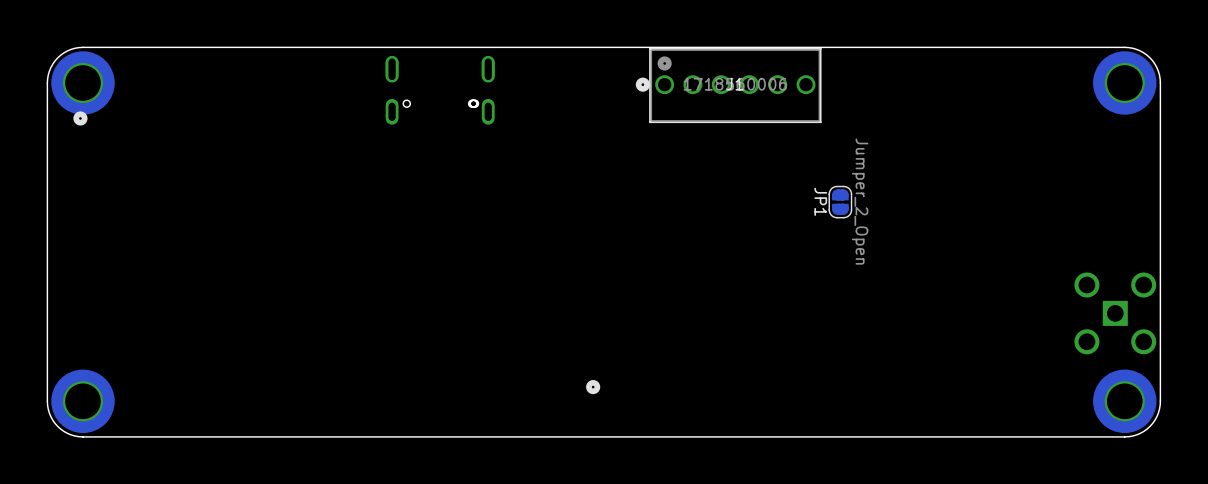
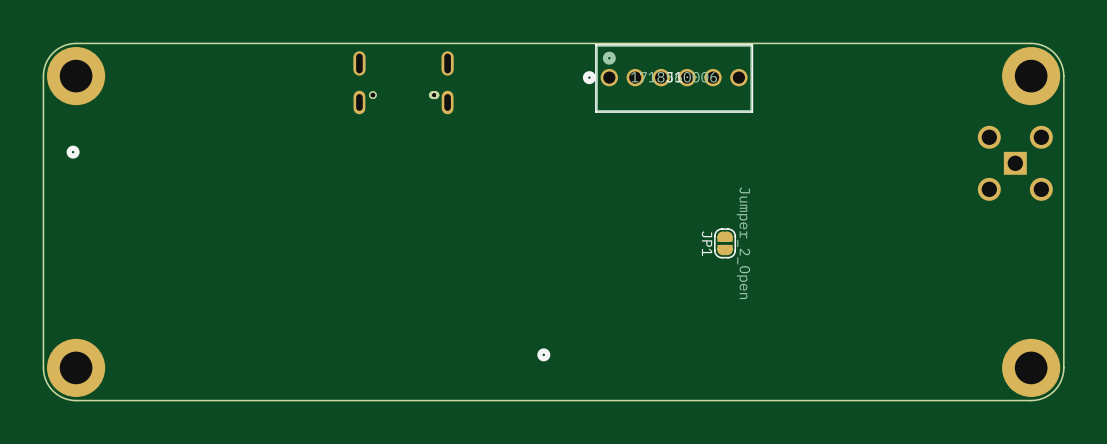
part position: (80, 118) -> (73, 152)
JP1 position: (840, 202) -> (725, 243)
part position: (1115, 313) -> (1015, 163)

